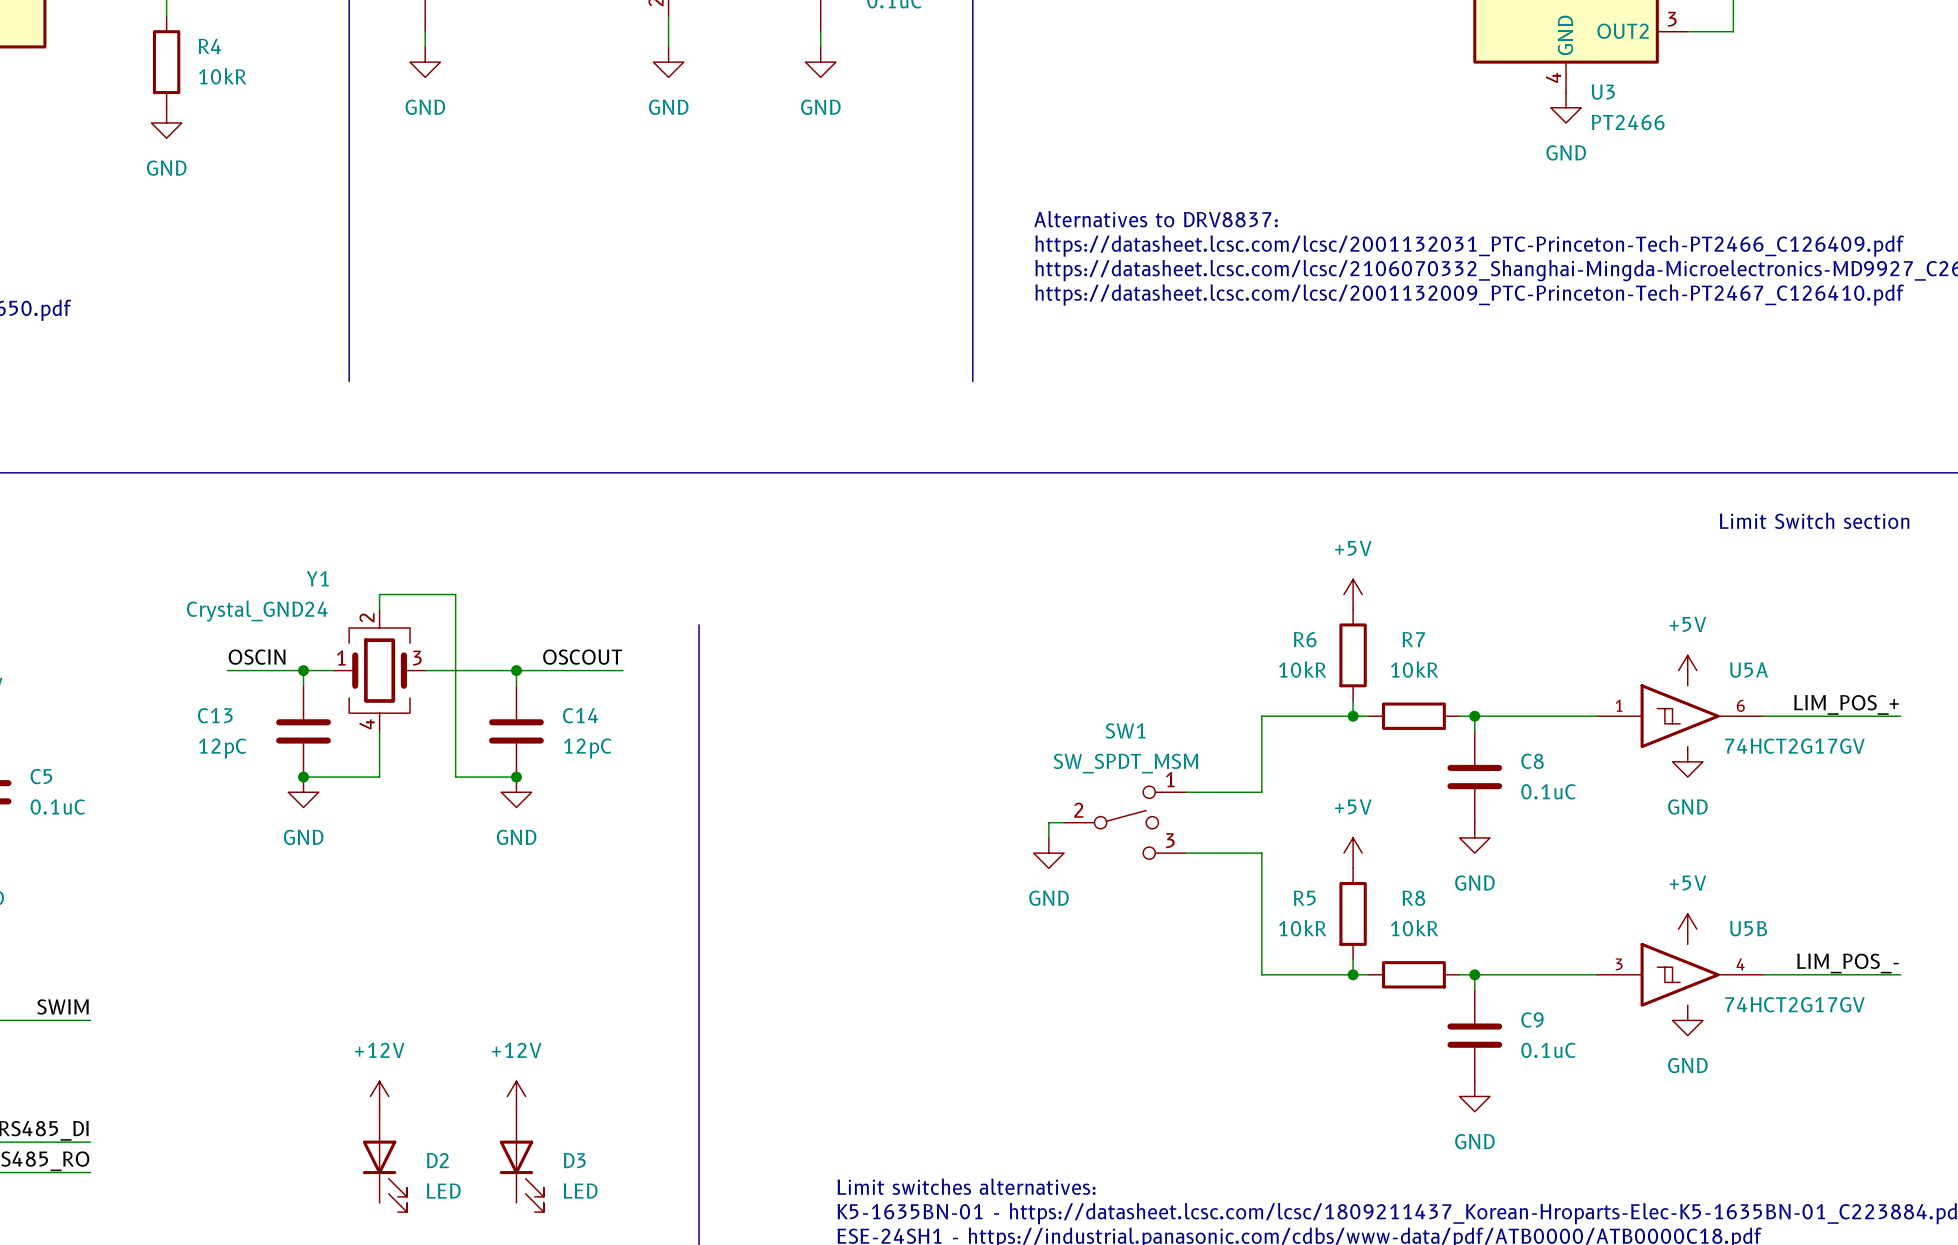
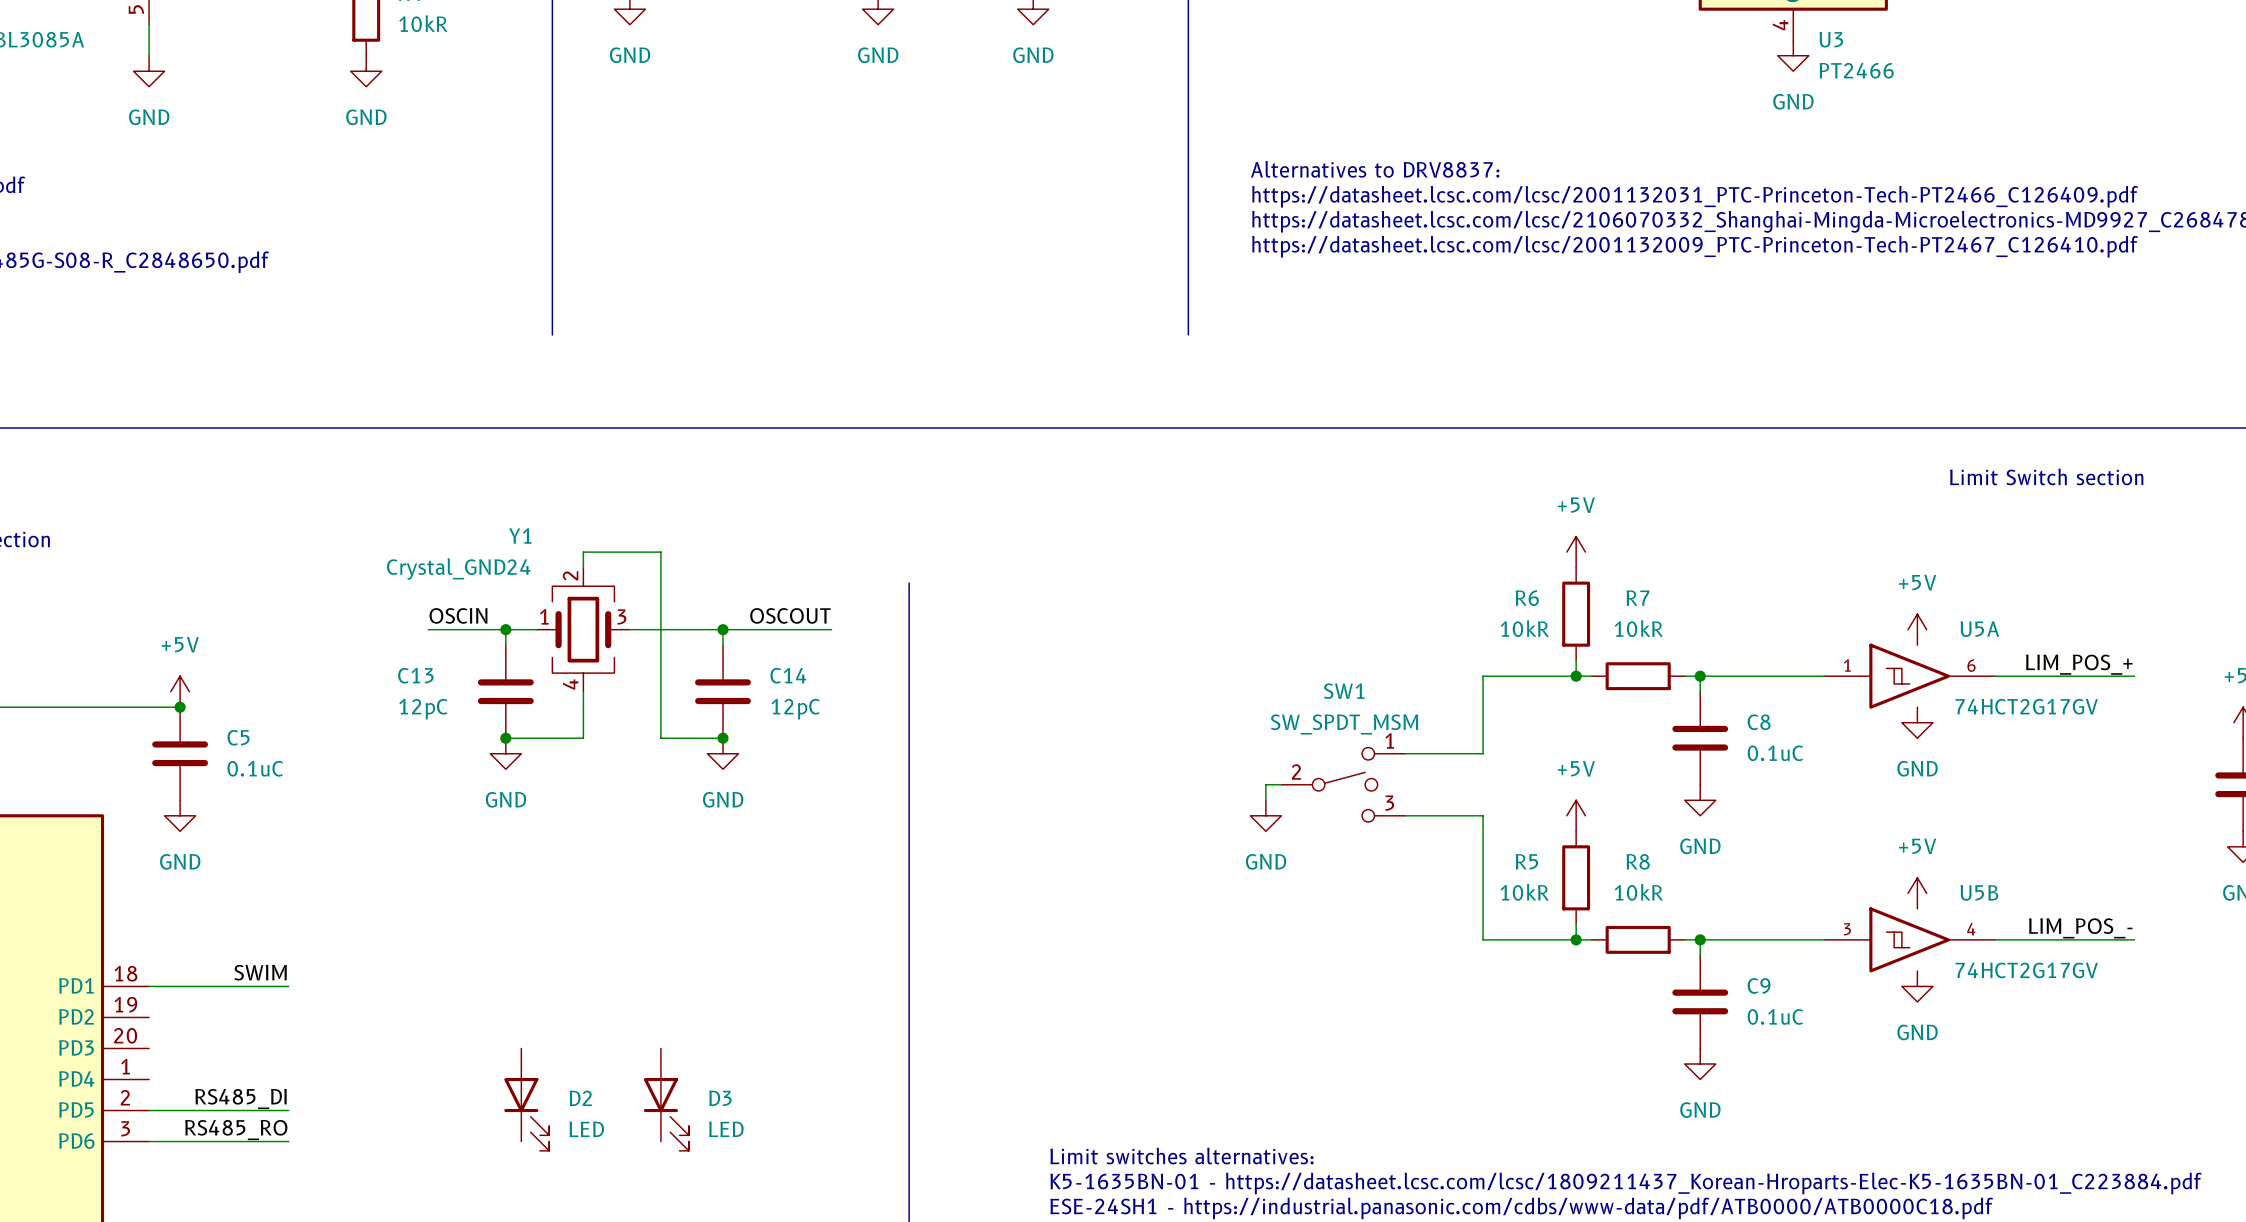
power symbol: +12V (379, 1096) -> none
power symbol: +12V (516, 1096) -> none
D2 position: (384, 1161) -> (526, 1099)
D3 position: (521, 1161) -> (666, 1099)

